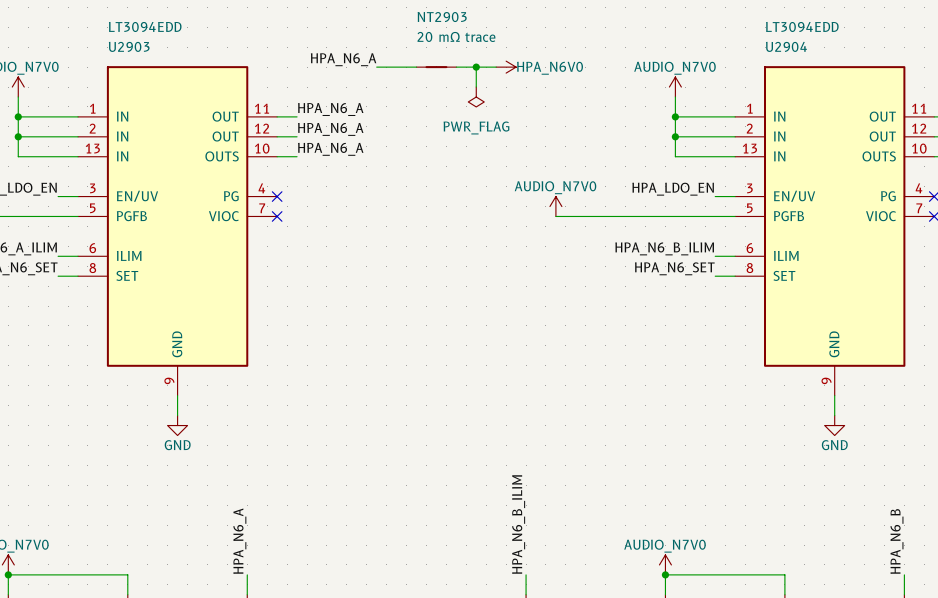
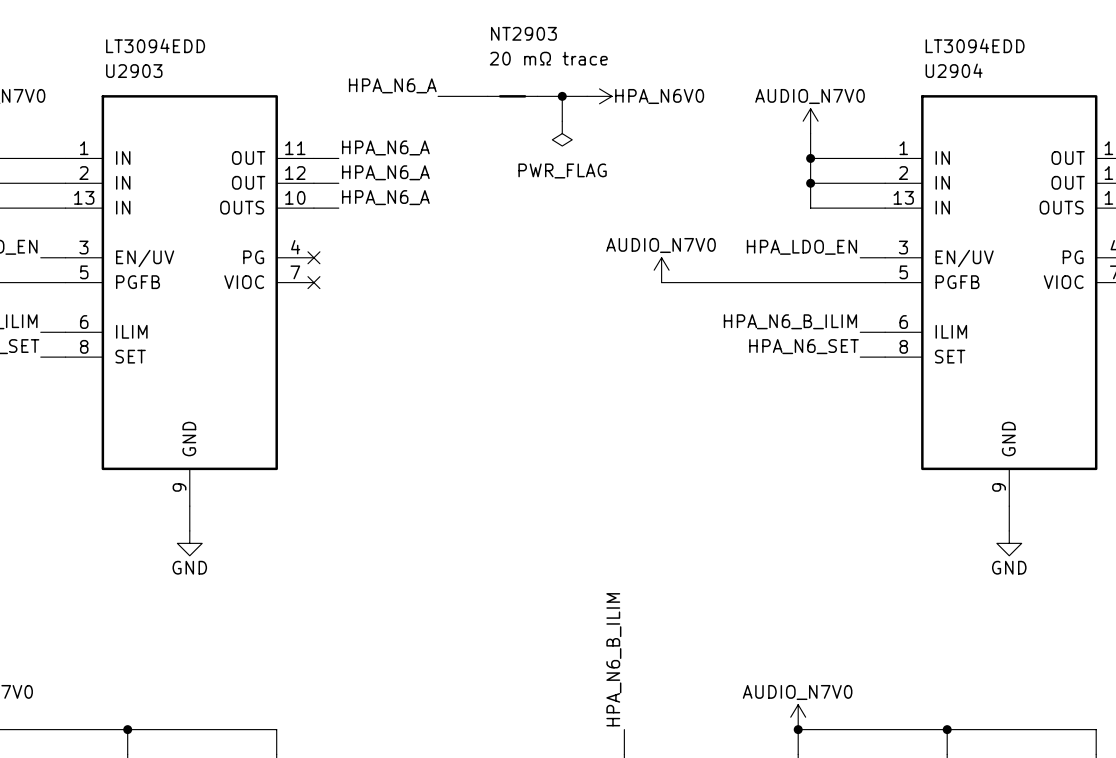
label: HPA_N6_A (239, 541) -> none
label: HPA_N6_B (896, 541) -> none
wire: none -> (127, 729) (276, 729)
junction: none -> (127, 729)
wire: none -> (947, 729) (1096, 729)
junction: none -> (947, 729)

